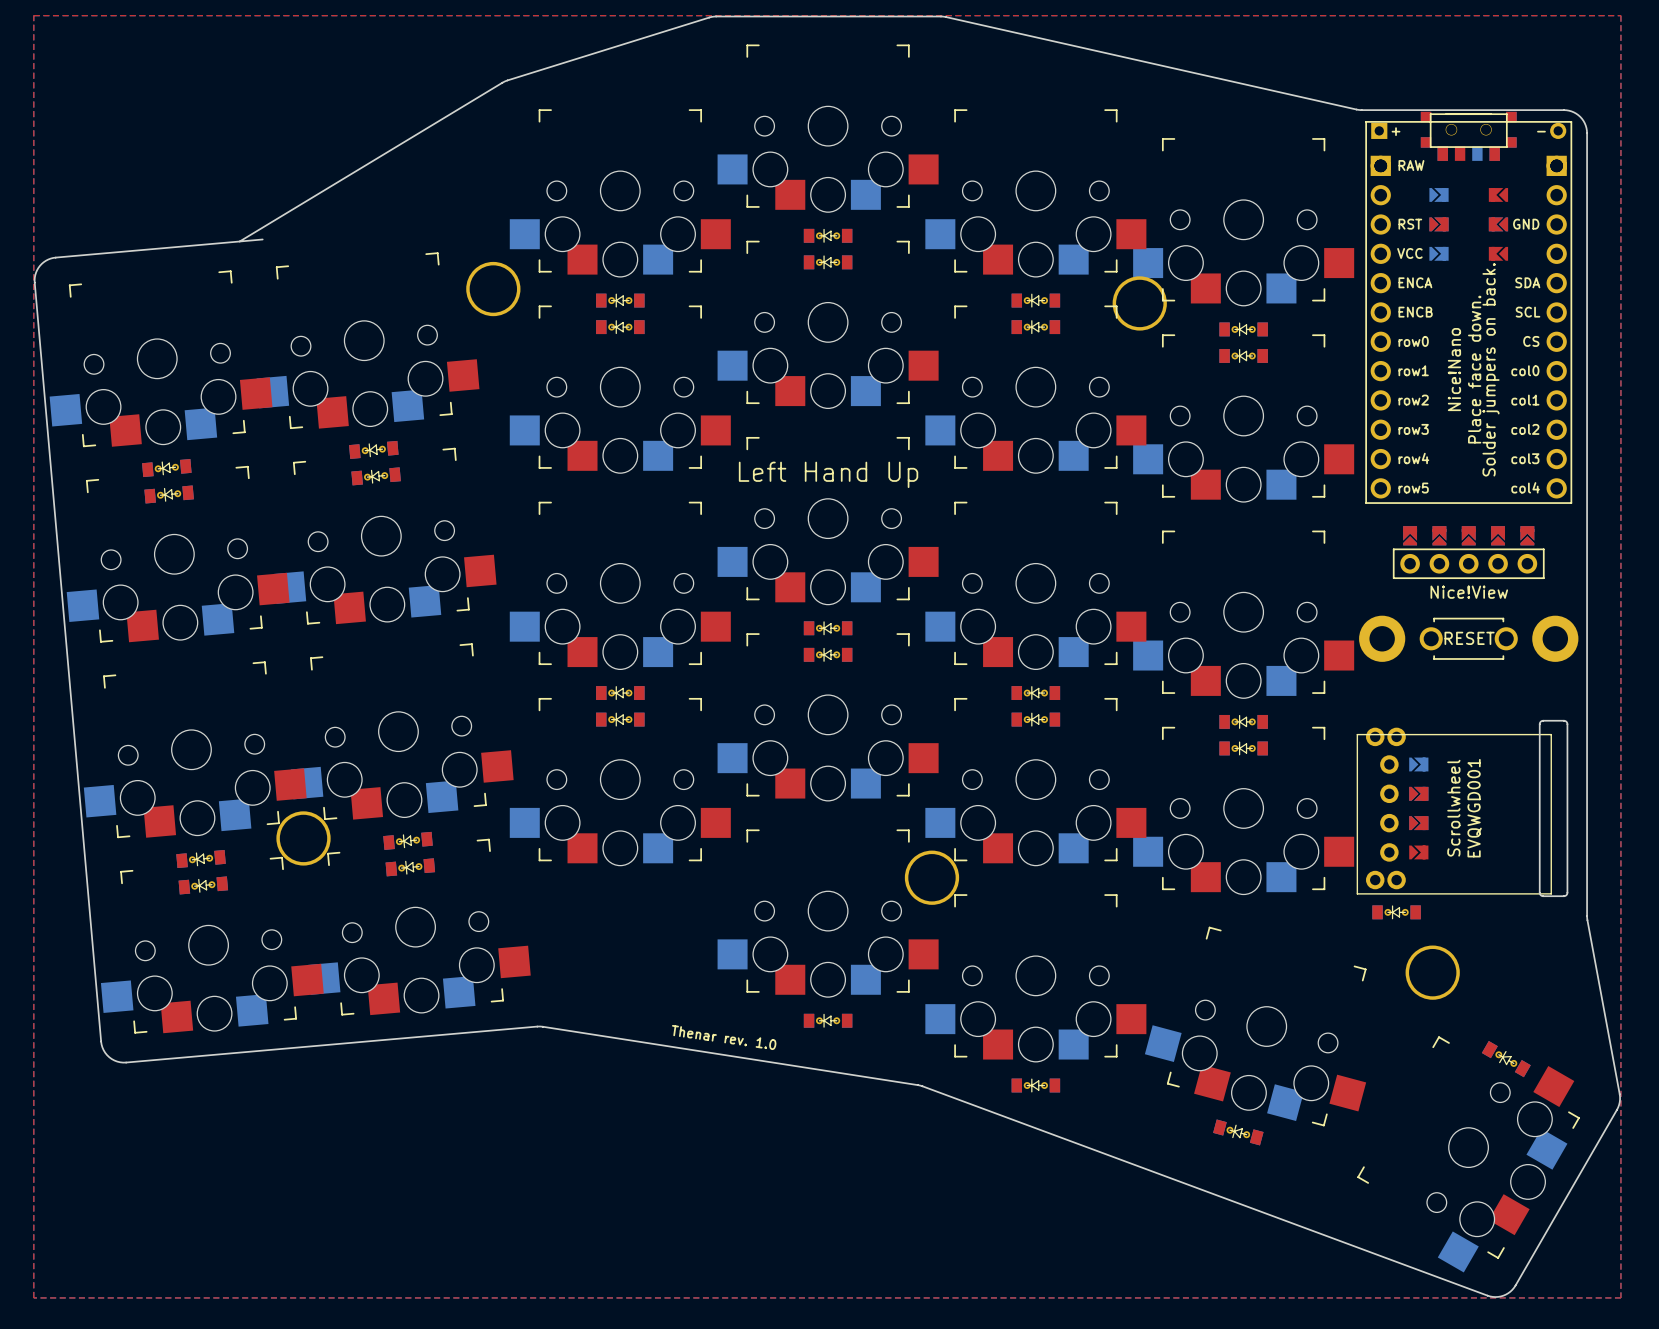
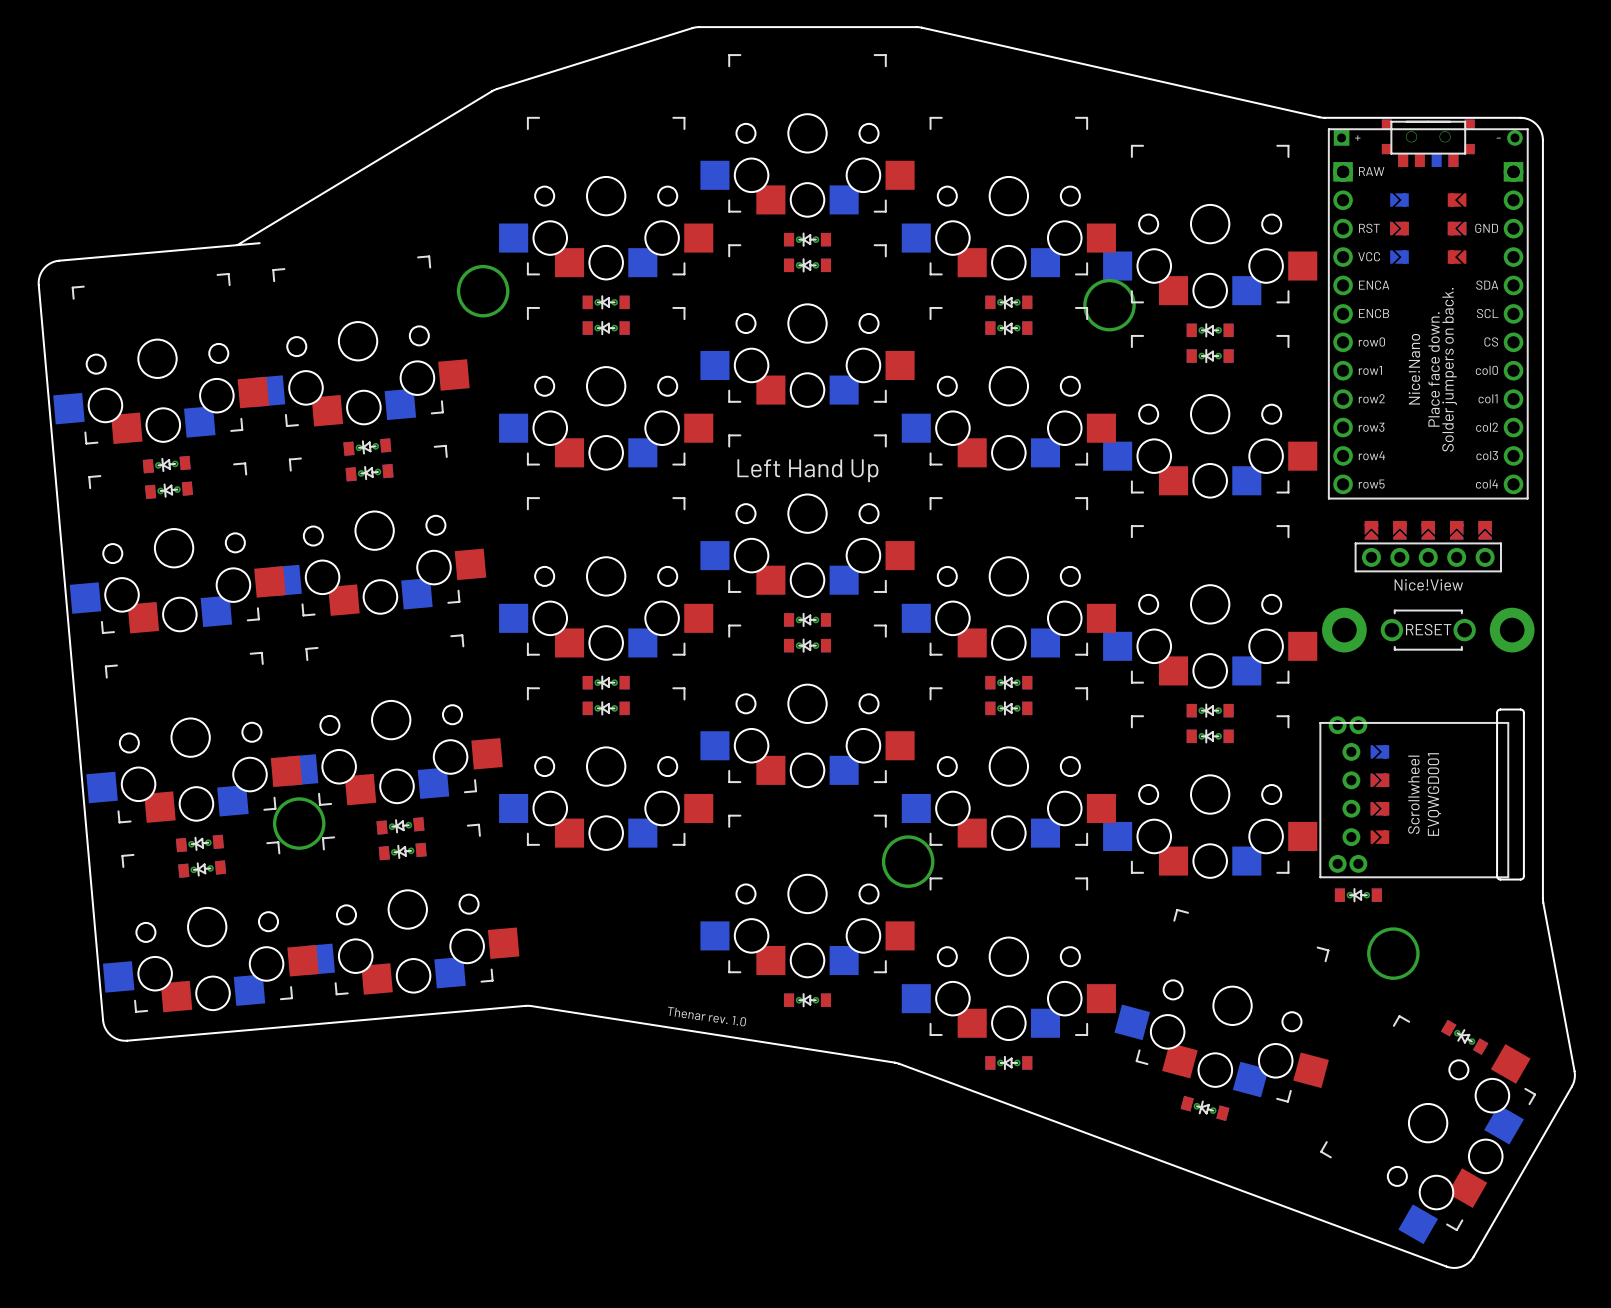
top zone outline: (33, 15) (33, 1297) (1620, 1297) (1620, 15) (33, 15) -> none

